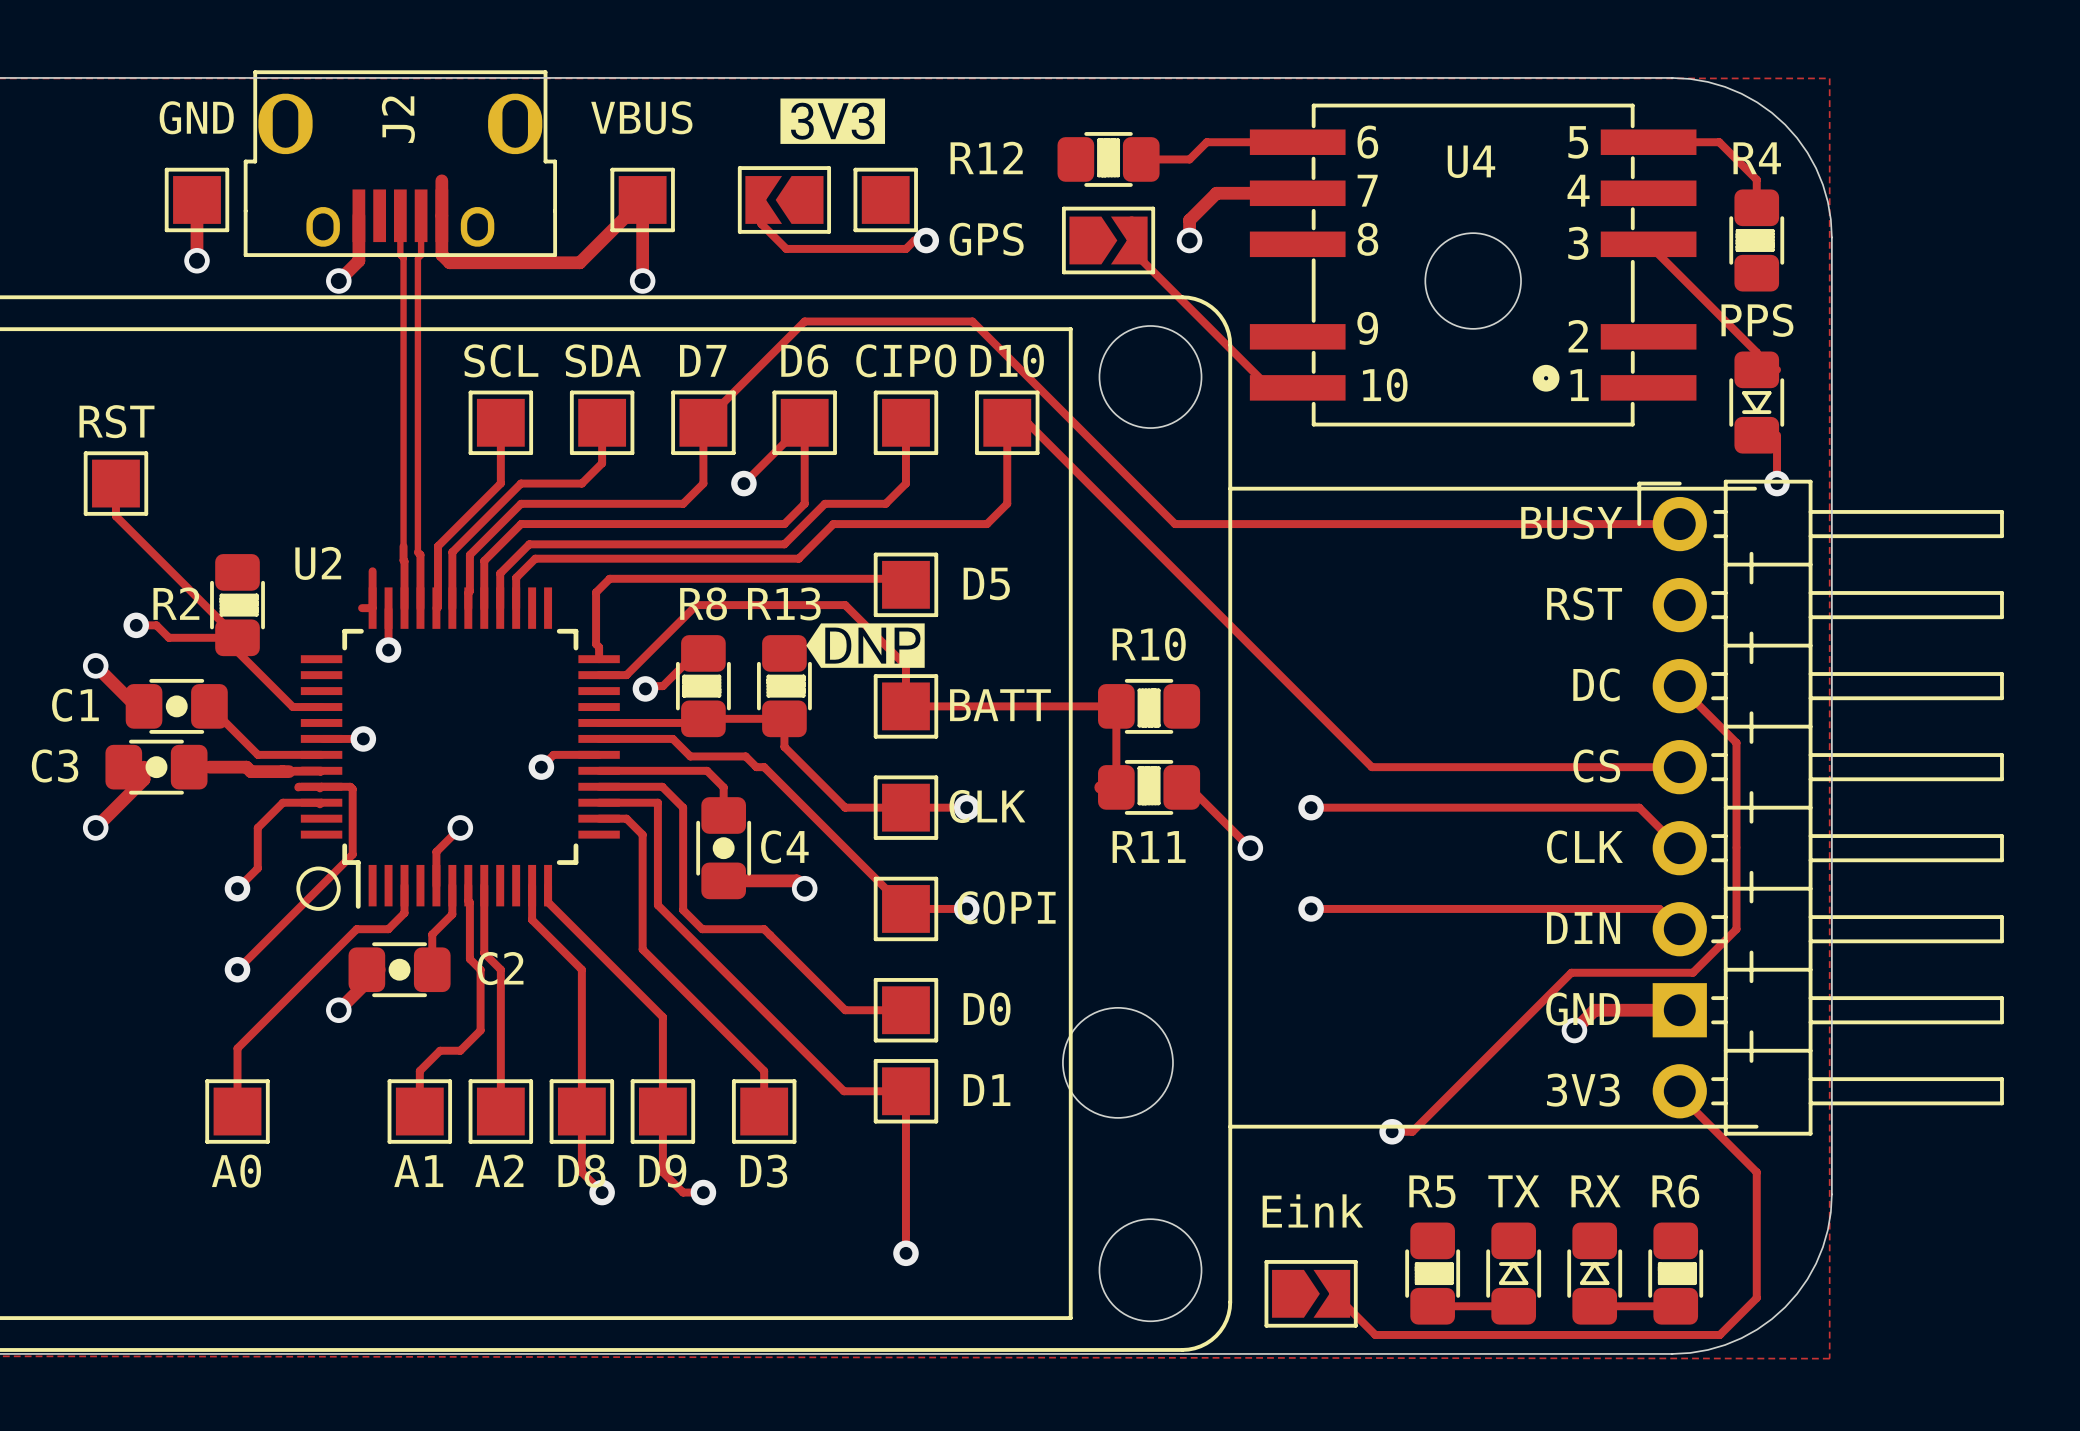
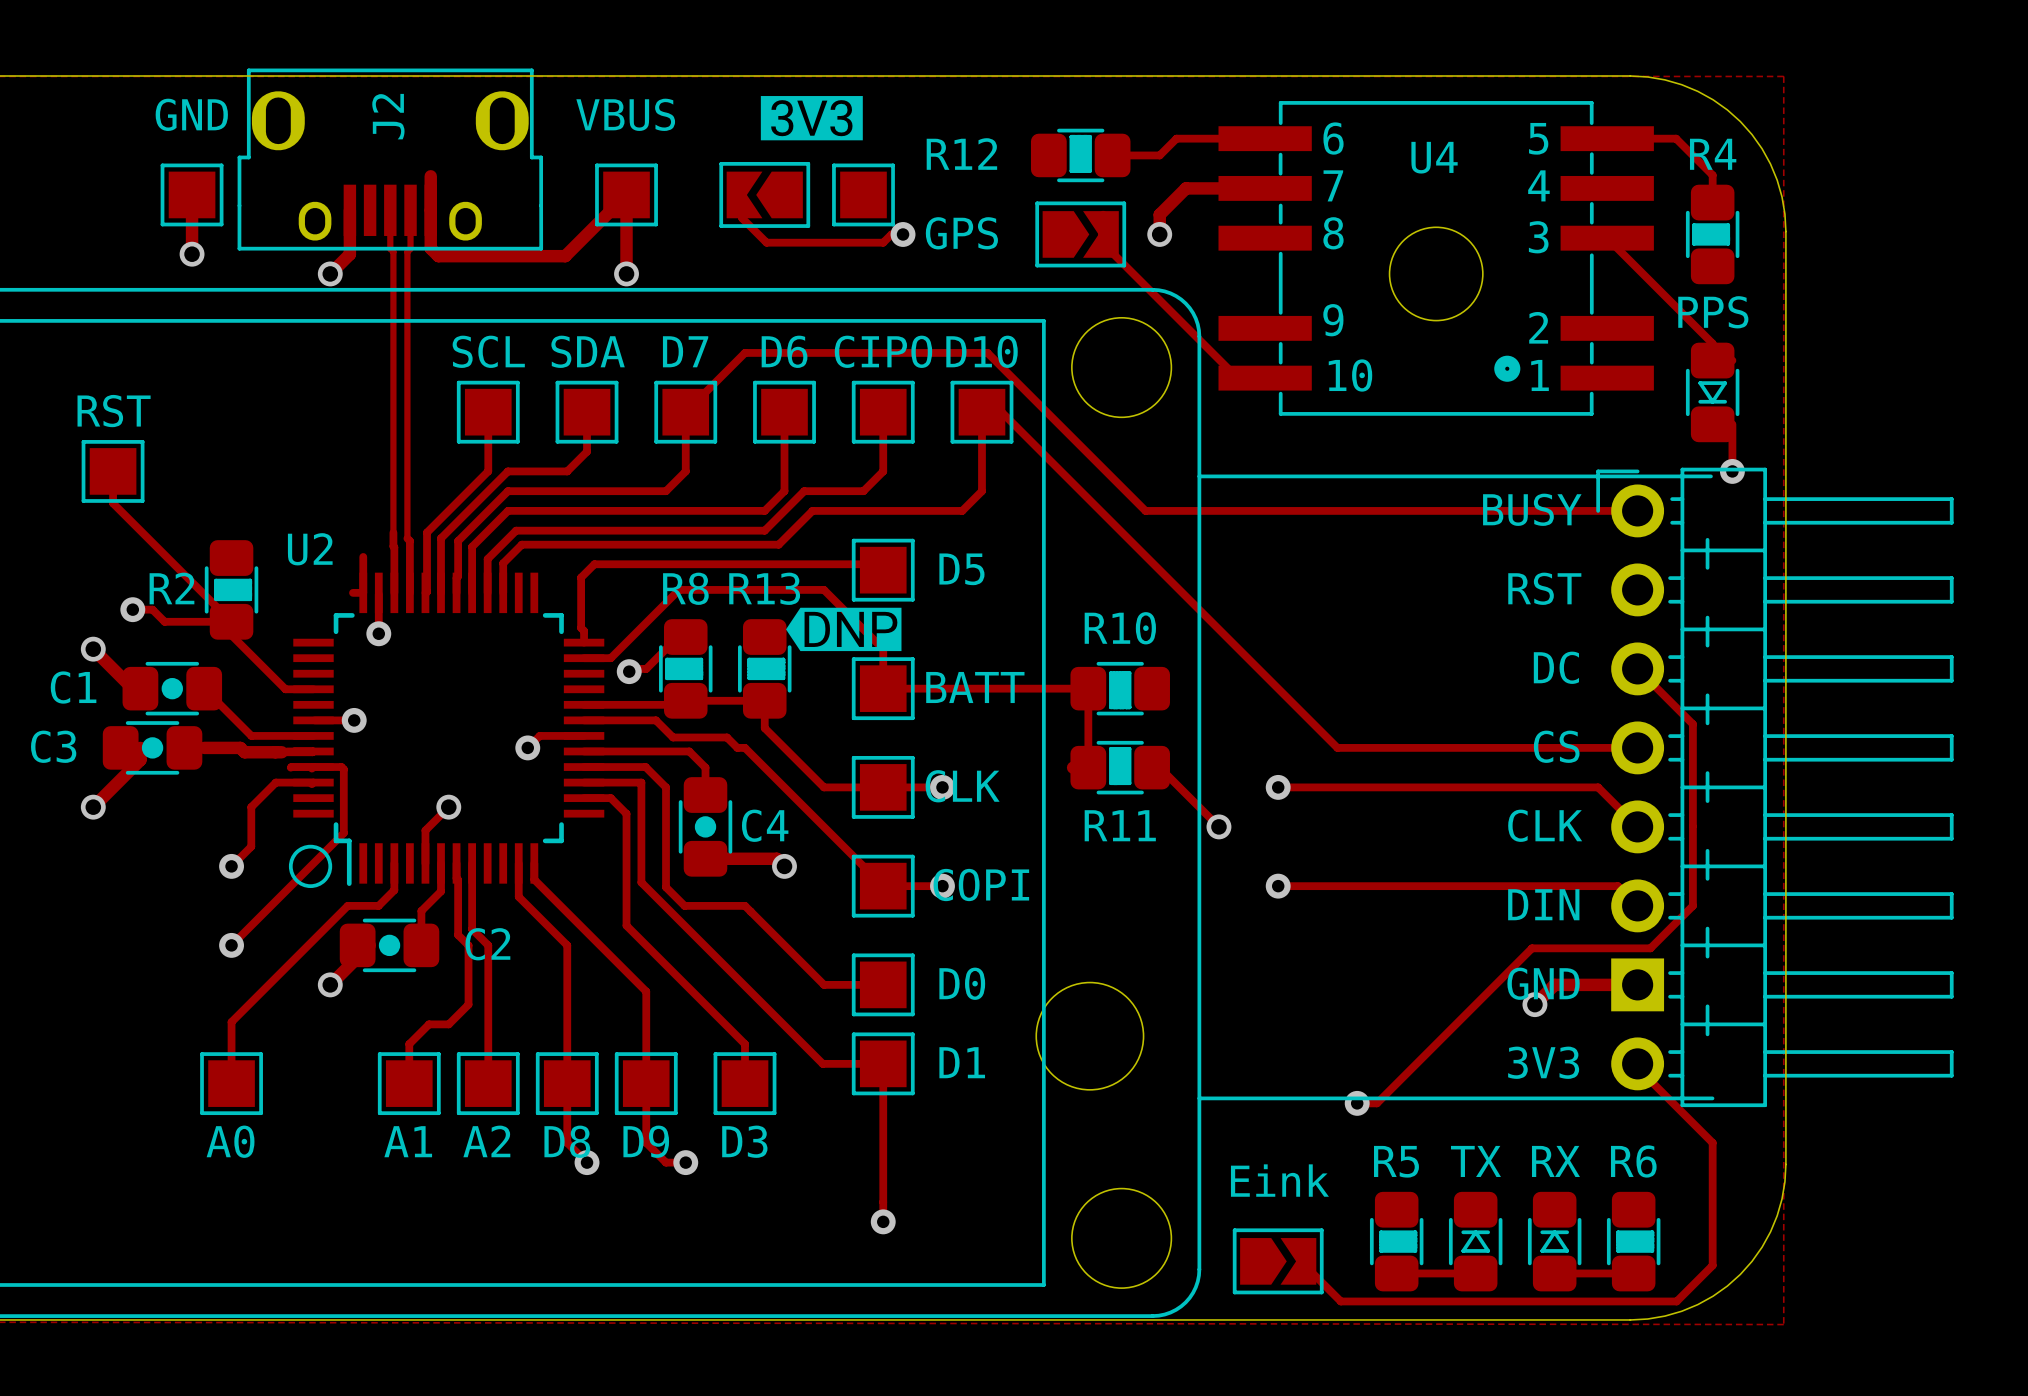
track: (764, 362) (804, 321) (972, 321) (1013, 362) -> (745, 352) (987, 352)
track: (804, 422) (743, 483) -> none
via: (743, 483) -> none

